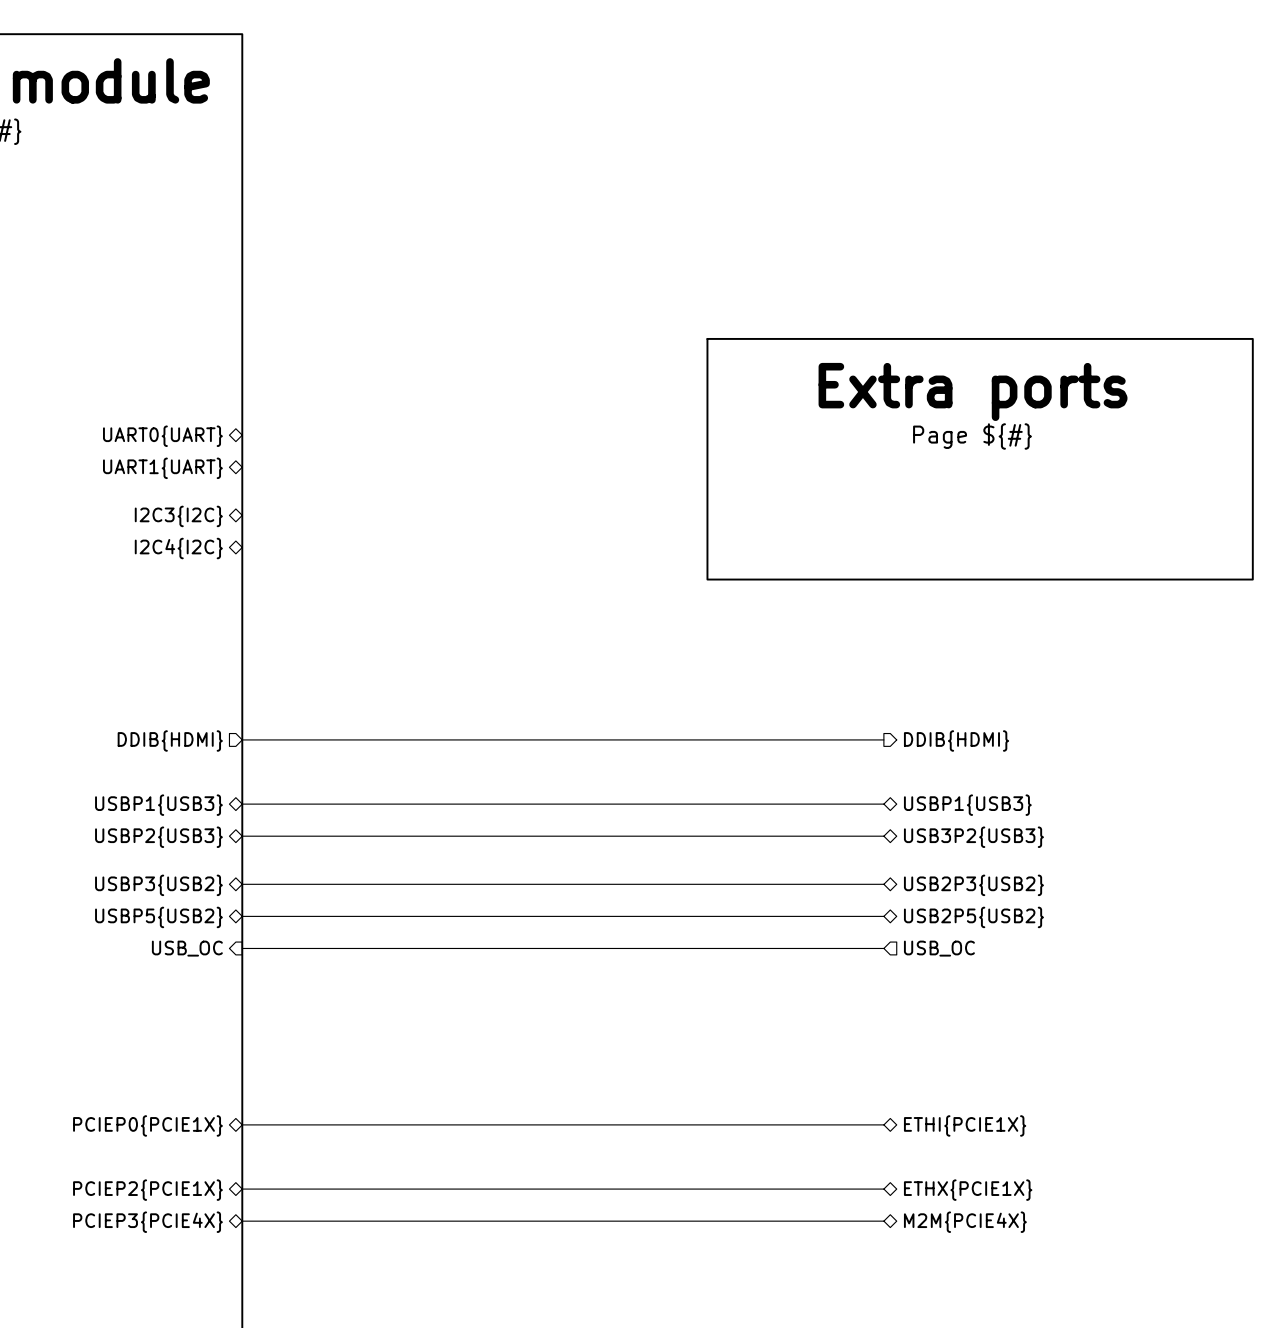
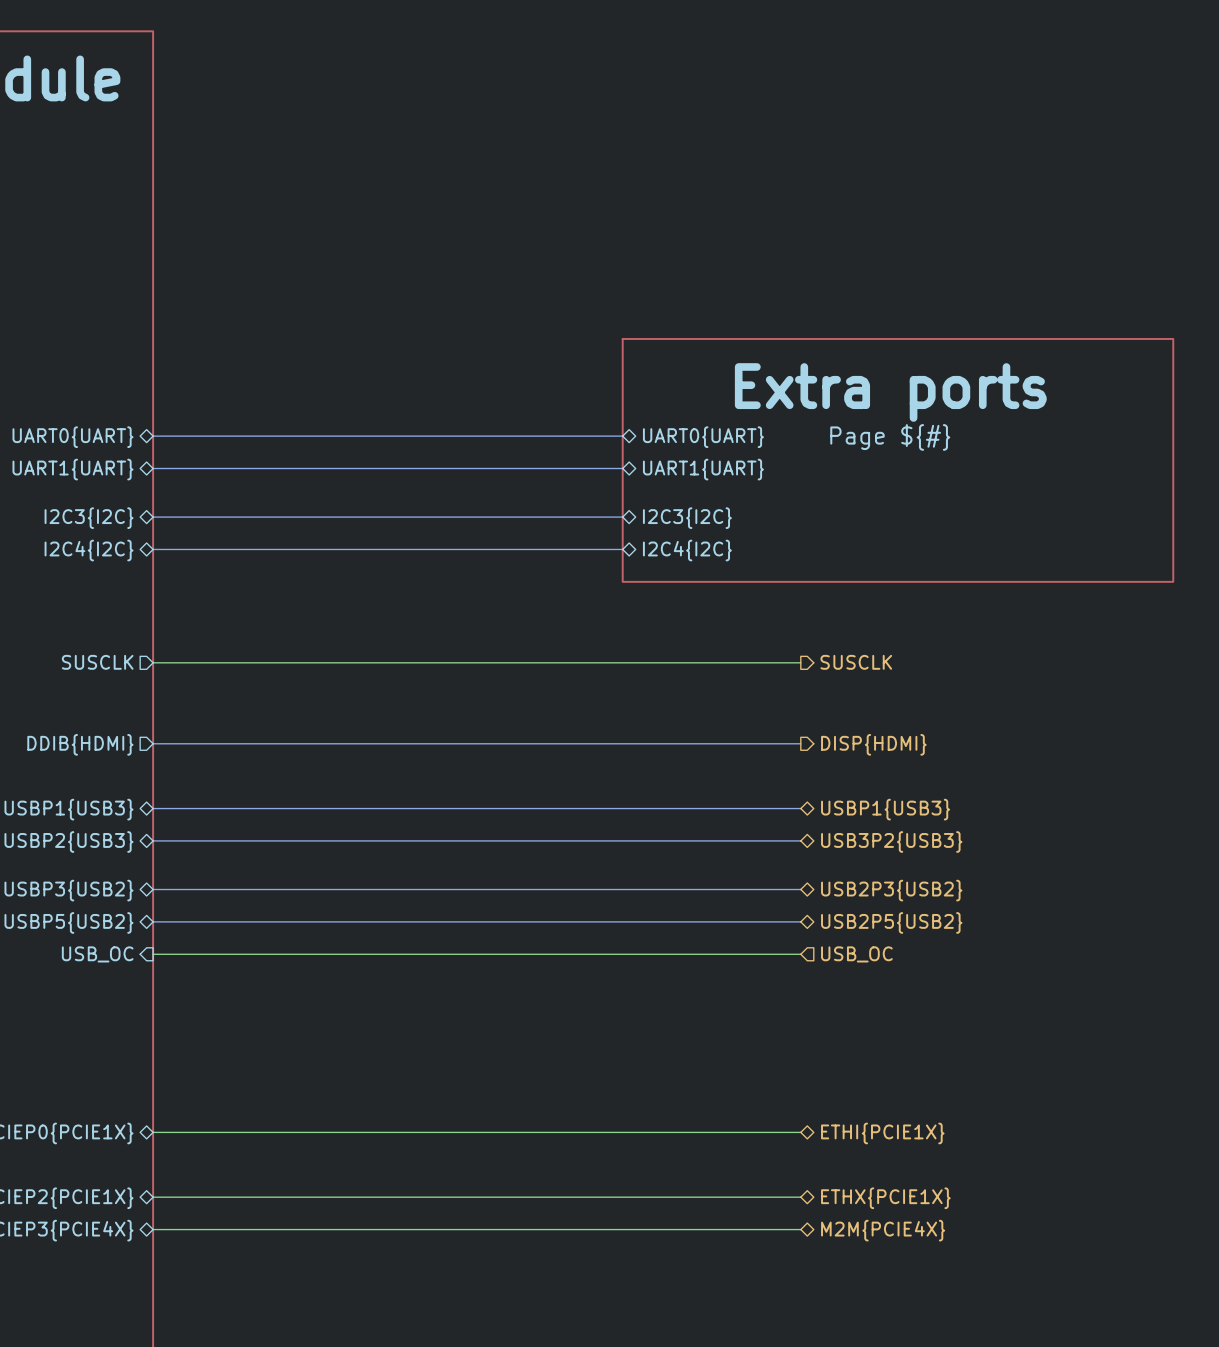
bus: none -> (153, 436) (622, 436)
sheet pin: none -> UART0{UART} (703, 437)
bus: none -> (153, 468) (622, 468)
sheet pin: none -> UART1{UART} (703, 469)
bus: none -> (153, 517) (622, 517)
sheet pin: none -> I2C3{I2C} (687, 518)
bus: none -> (153, 549) (622, 549)
sheet pin: none -> I2C4{I2C} (687, 550)
sheet pin: none -> SUSCLK (97, 662)
wire: none -> (153, 662) (800, 662)
hierarchical label: none -> SUSCLK (856, 662)
hierarchical label: DDIB{HDMI} (956, 740) -> DISP{HDMI} (873, 744)

